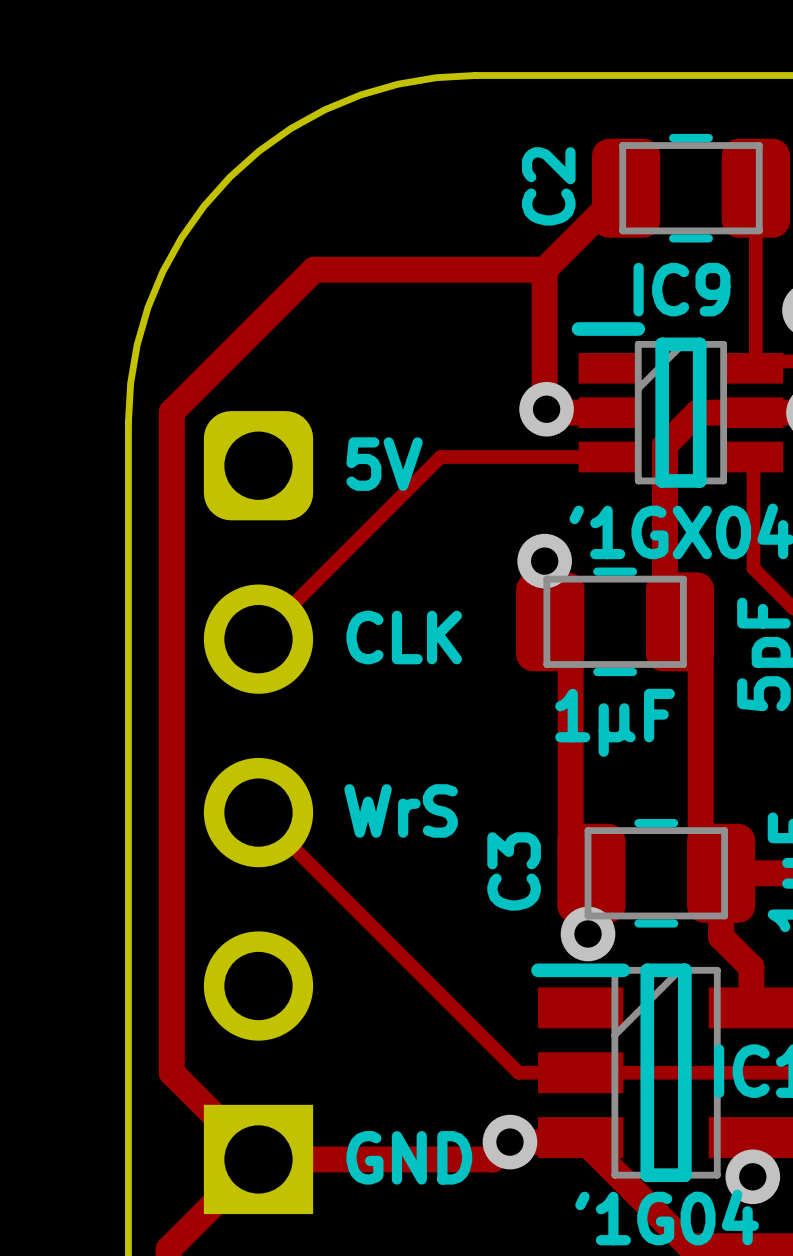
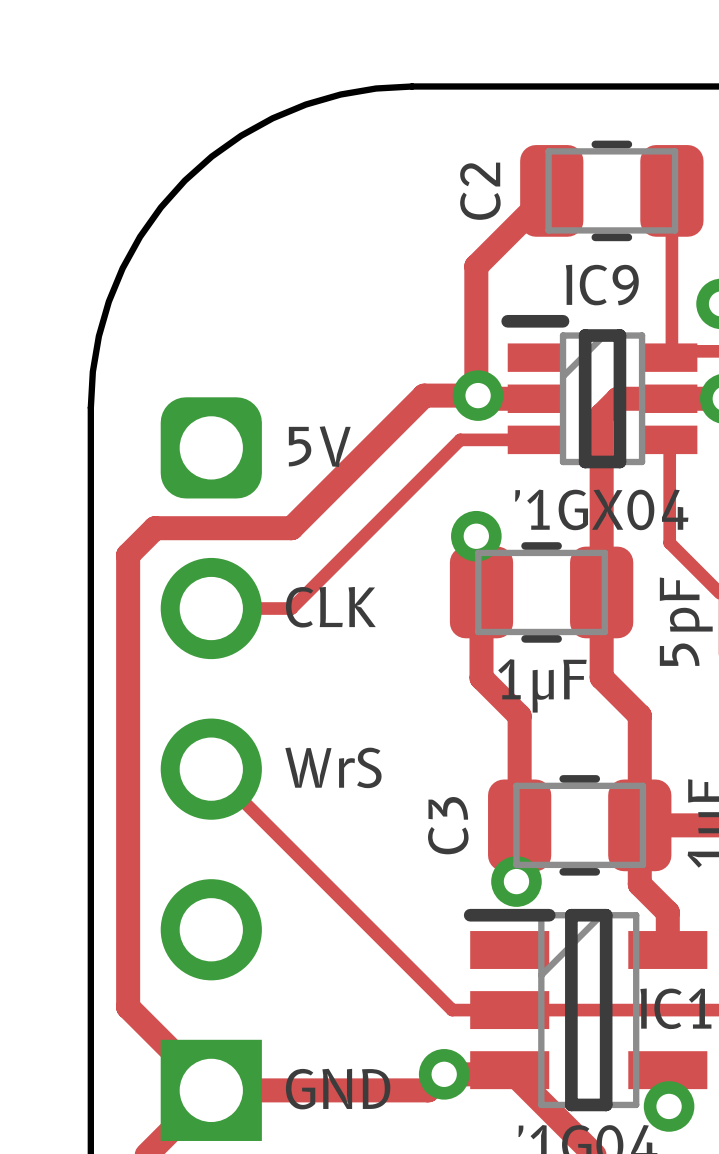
track: (544, 269) (314, 269) (171, 412) (171, 1072) -> (291, 528) (155, 528) (128, 555) (128, 1007) (130, 1010)
track: (680, 430) (664, 445) (664, 606) -> (601, 415) (601, 677) (639, 715) (639, 825)
track: (440, 457) (527, 457) -> (379, 439) (424, 395) (478, 395)
track width: thin (440, 457) (345, 552) -> thick (379, 439) (291, 528)
track: (345, 552) (258, 639) -> (460, 439) (291, 608) (211, 608)
track: none -> (481, 592) (481, 677) (519, 716) (519, 825)
track: (570, 642) (570, 852) -> none
track: (700, 642) (700, 852) -> none

